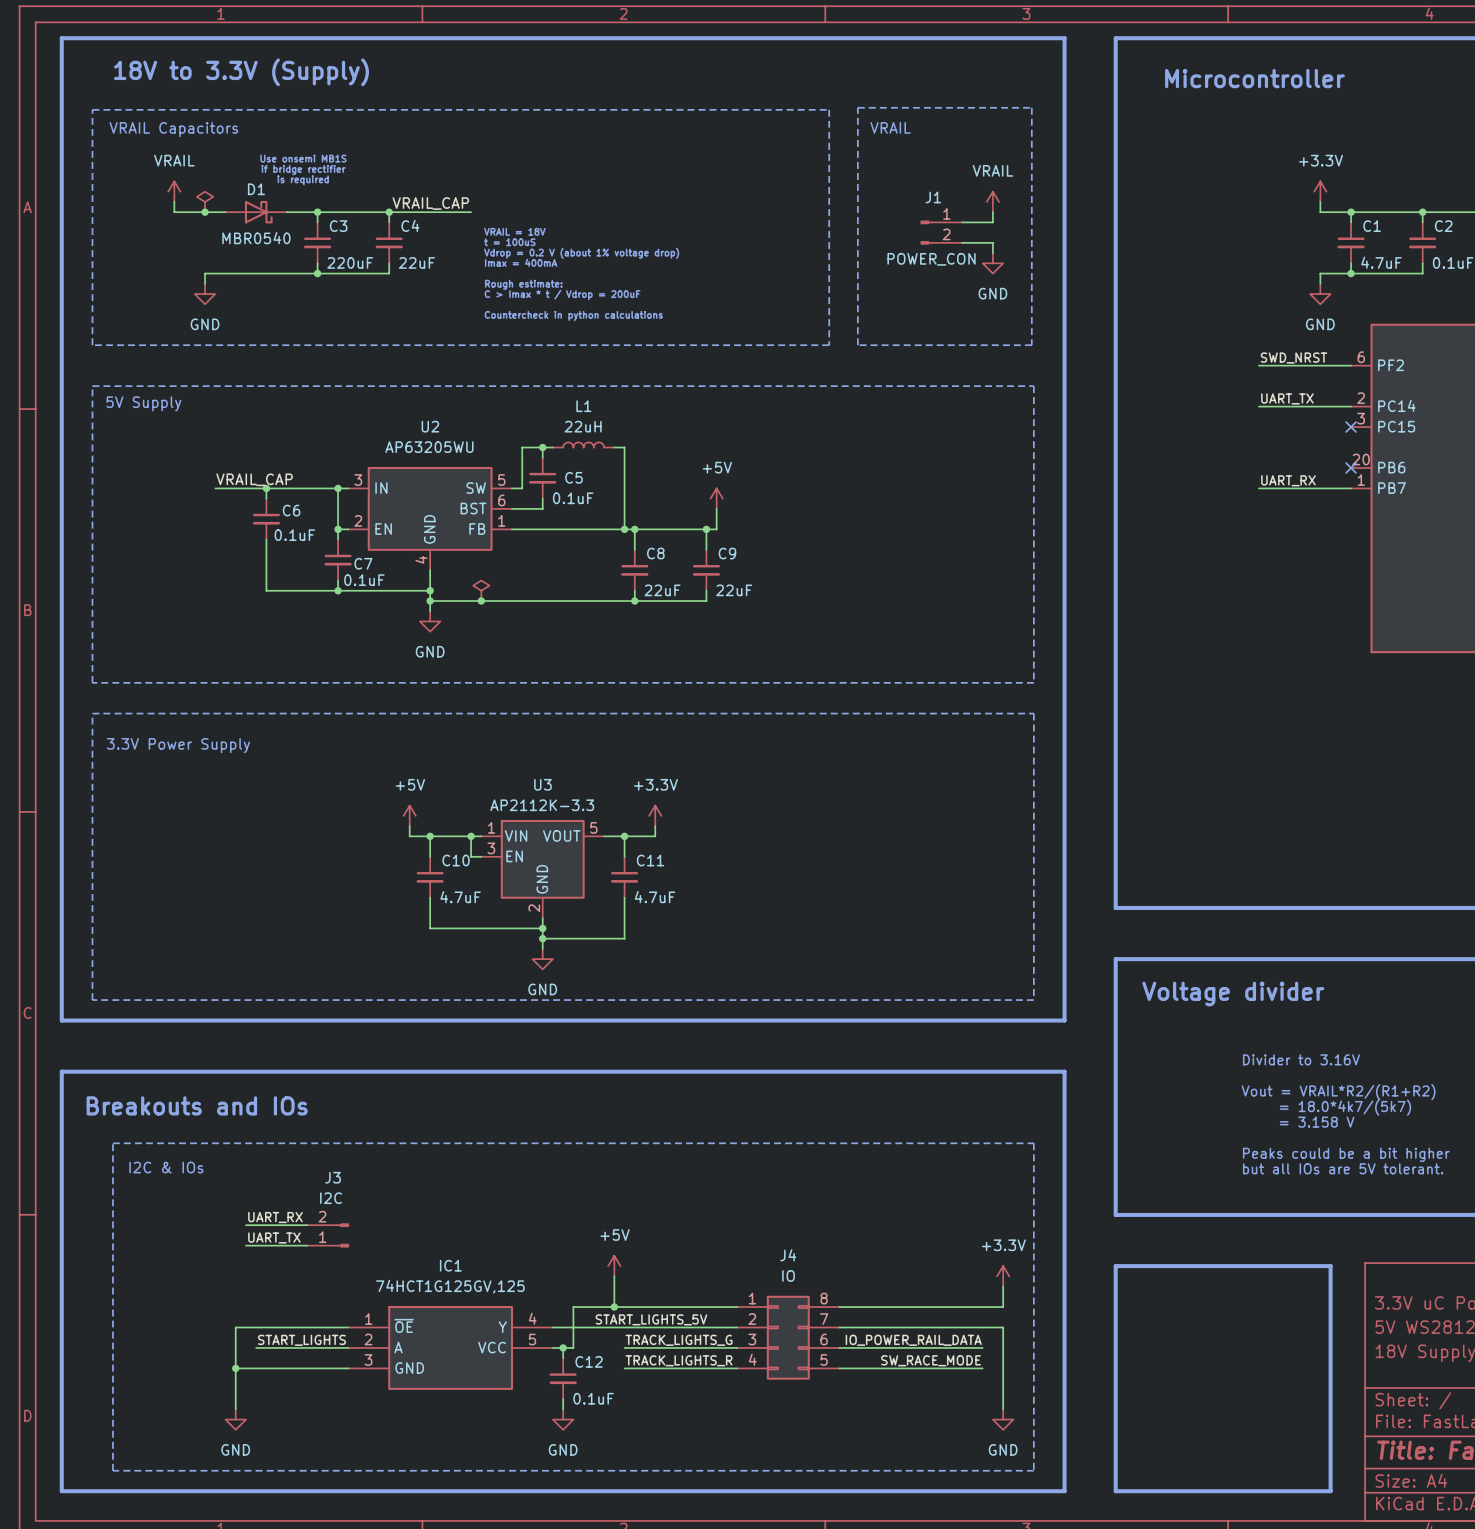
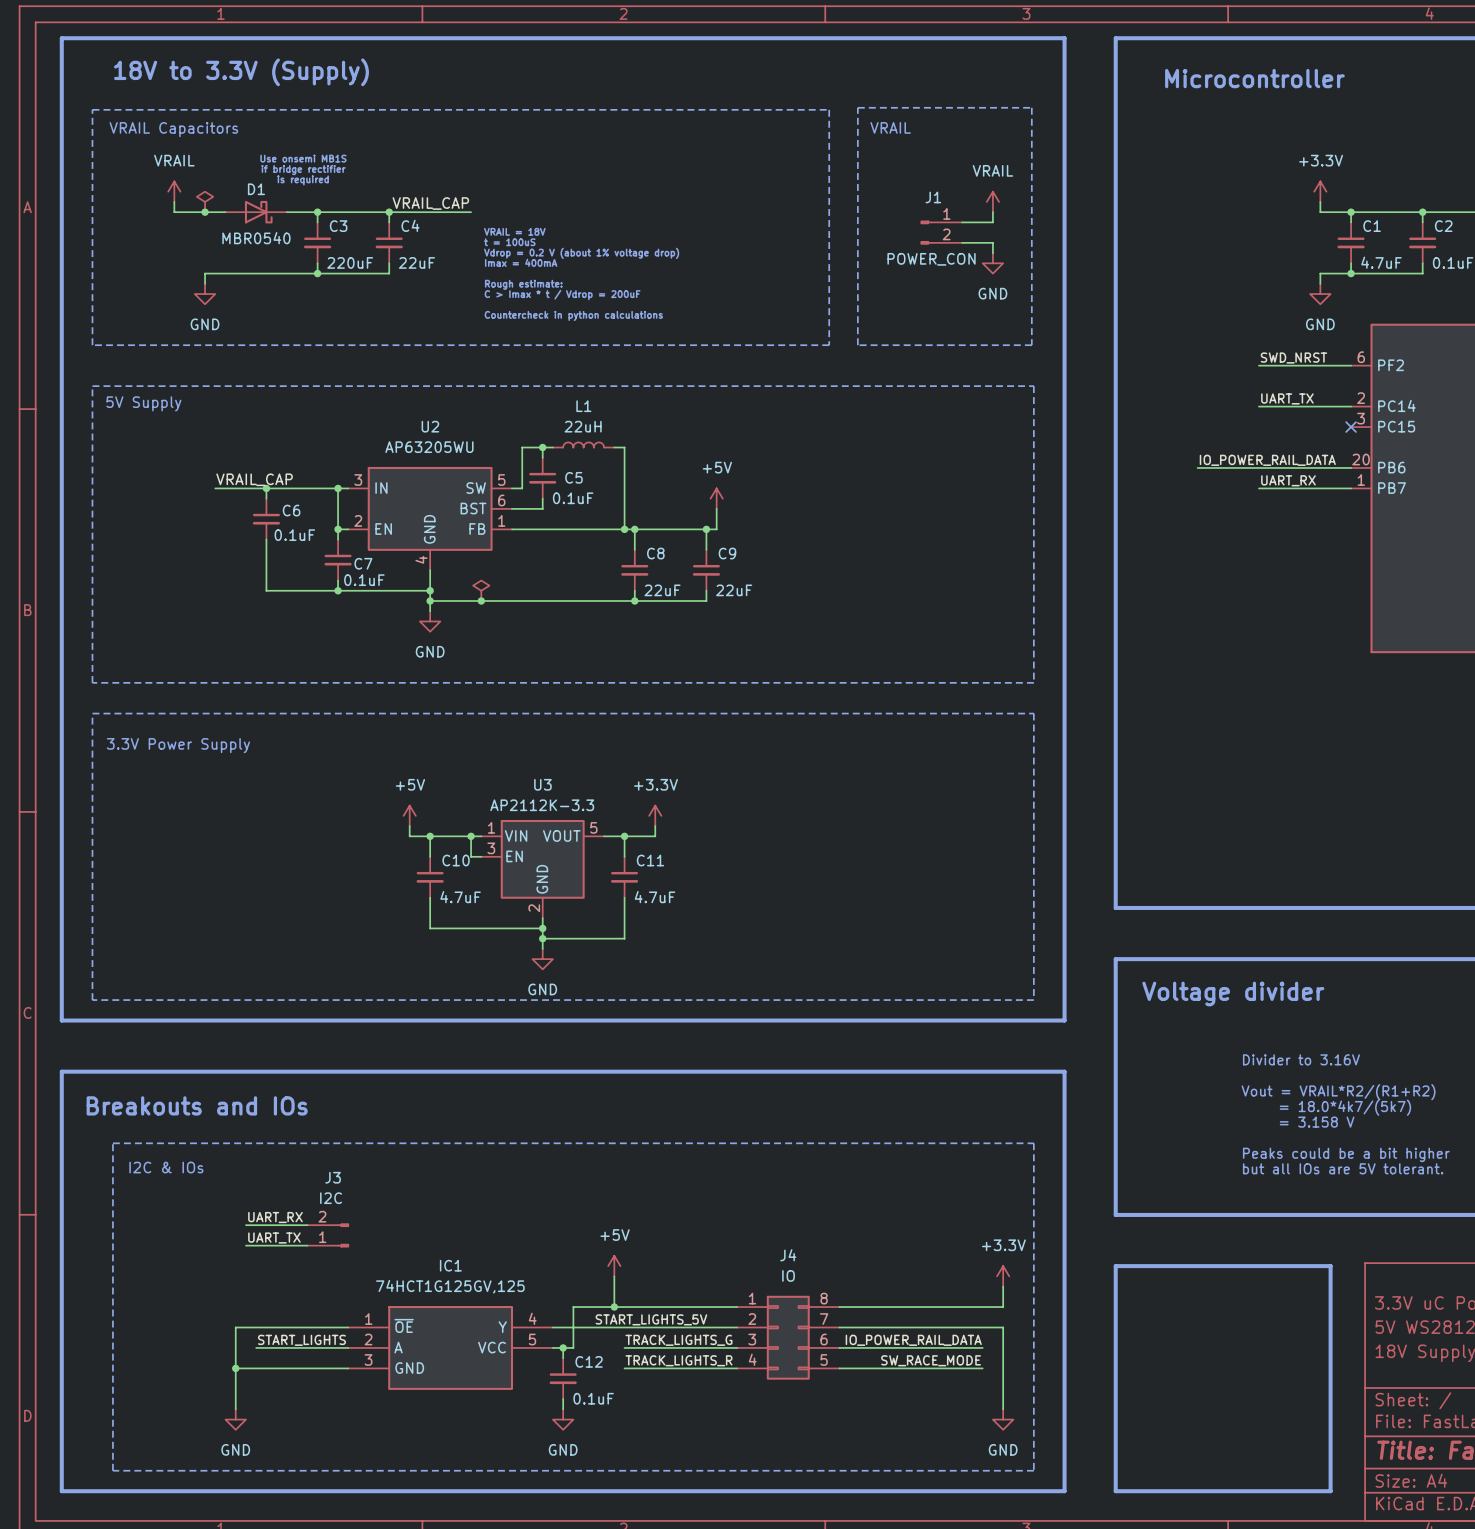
label: none -> IO_POWER_RAIL_DATA (1267, 460)
wire: none -> (1197, 467) (1351, 467)
no-connect mark: (1351, 467) -> none

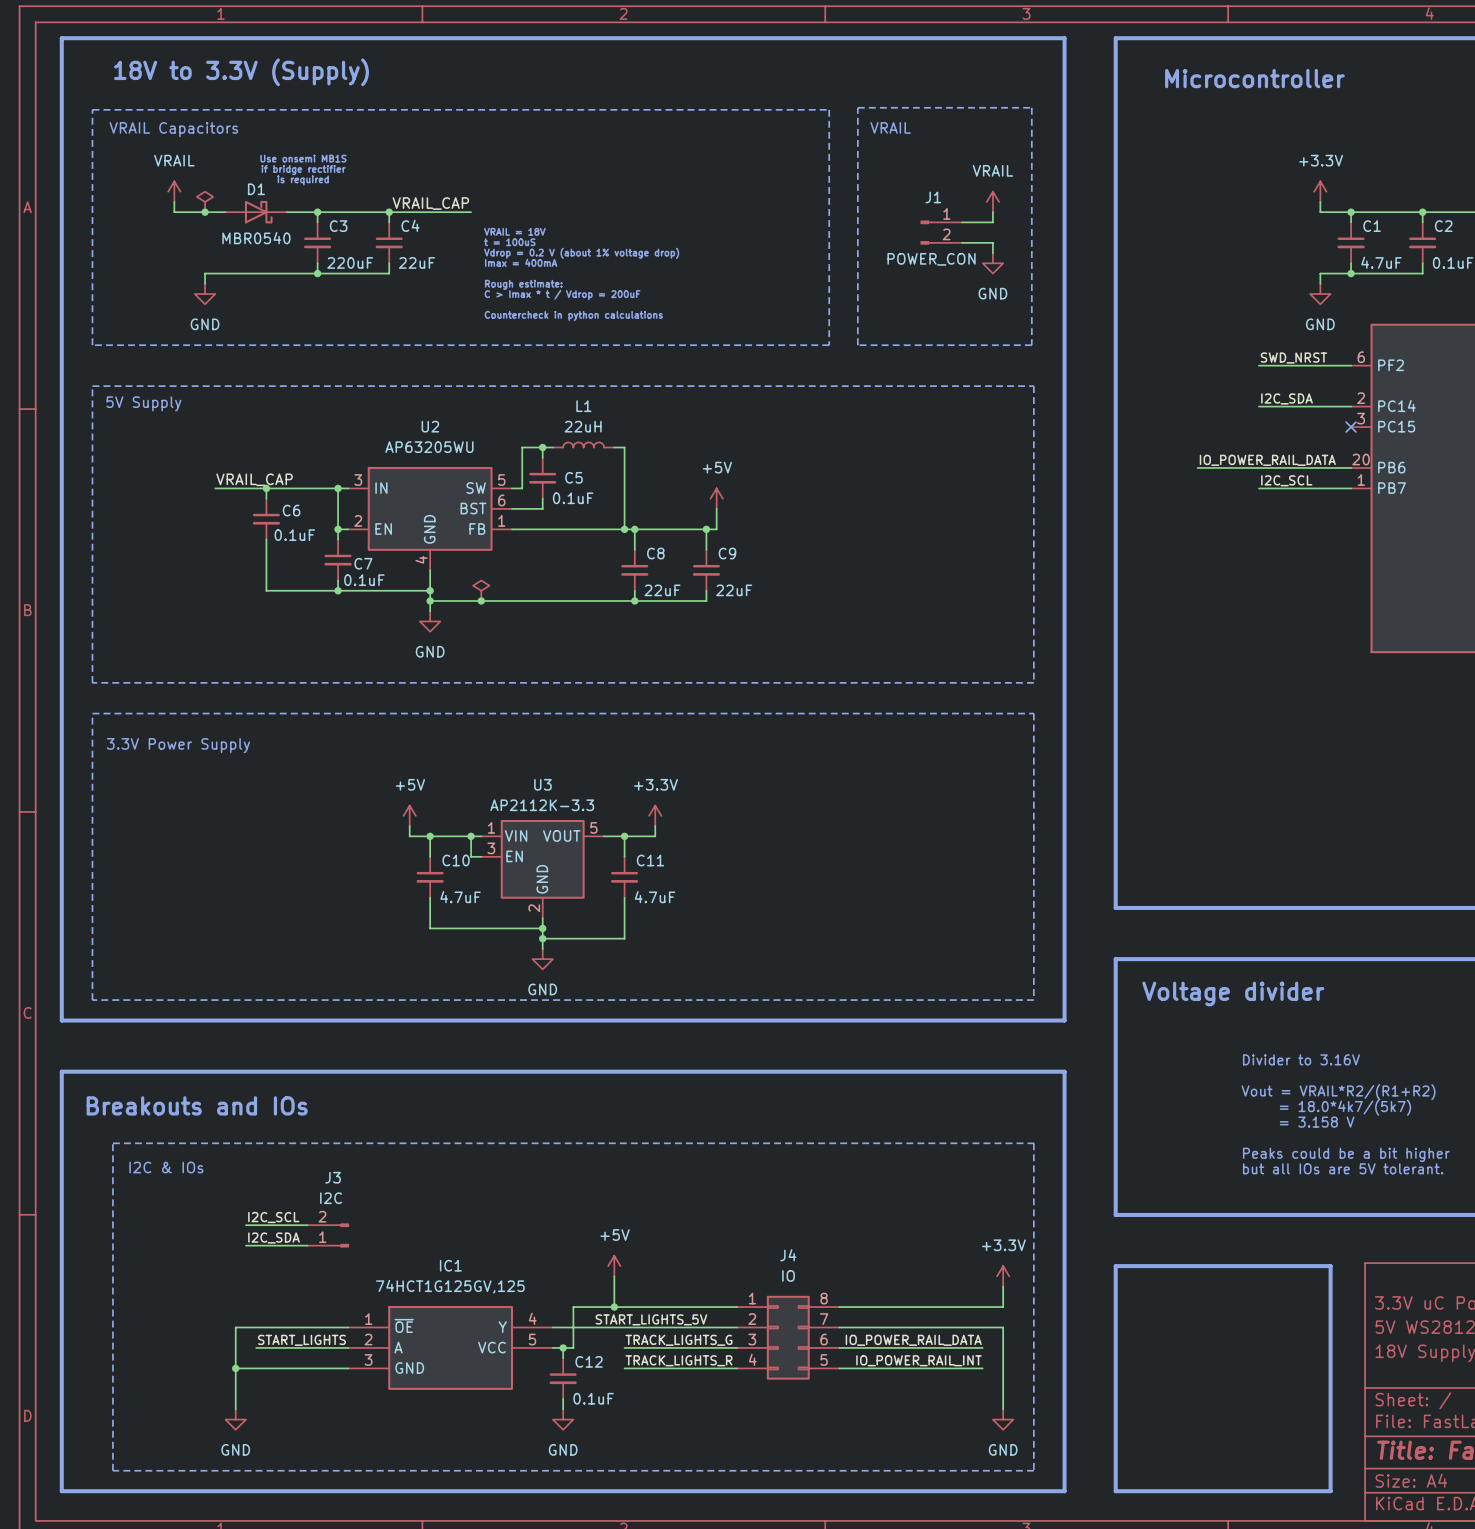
label: UART_TX (1287, 398) -> I2C_SDA (1287, 398)
label: UART_RX (1288, 480) -> I2C_SCL (1286, 480)
label: UART_RX (275, 1217) -> I2C_SCL (273, 1217)
label: UART_TX (274, 1237) -> I2C_SDA (274, 1237)
label: SW_RACE_MODE (931, 1360) -> IO_POWER_RAIL_INT (919, 1360)

